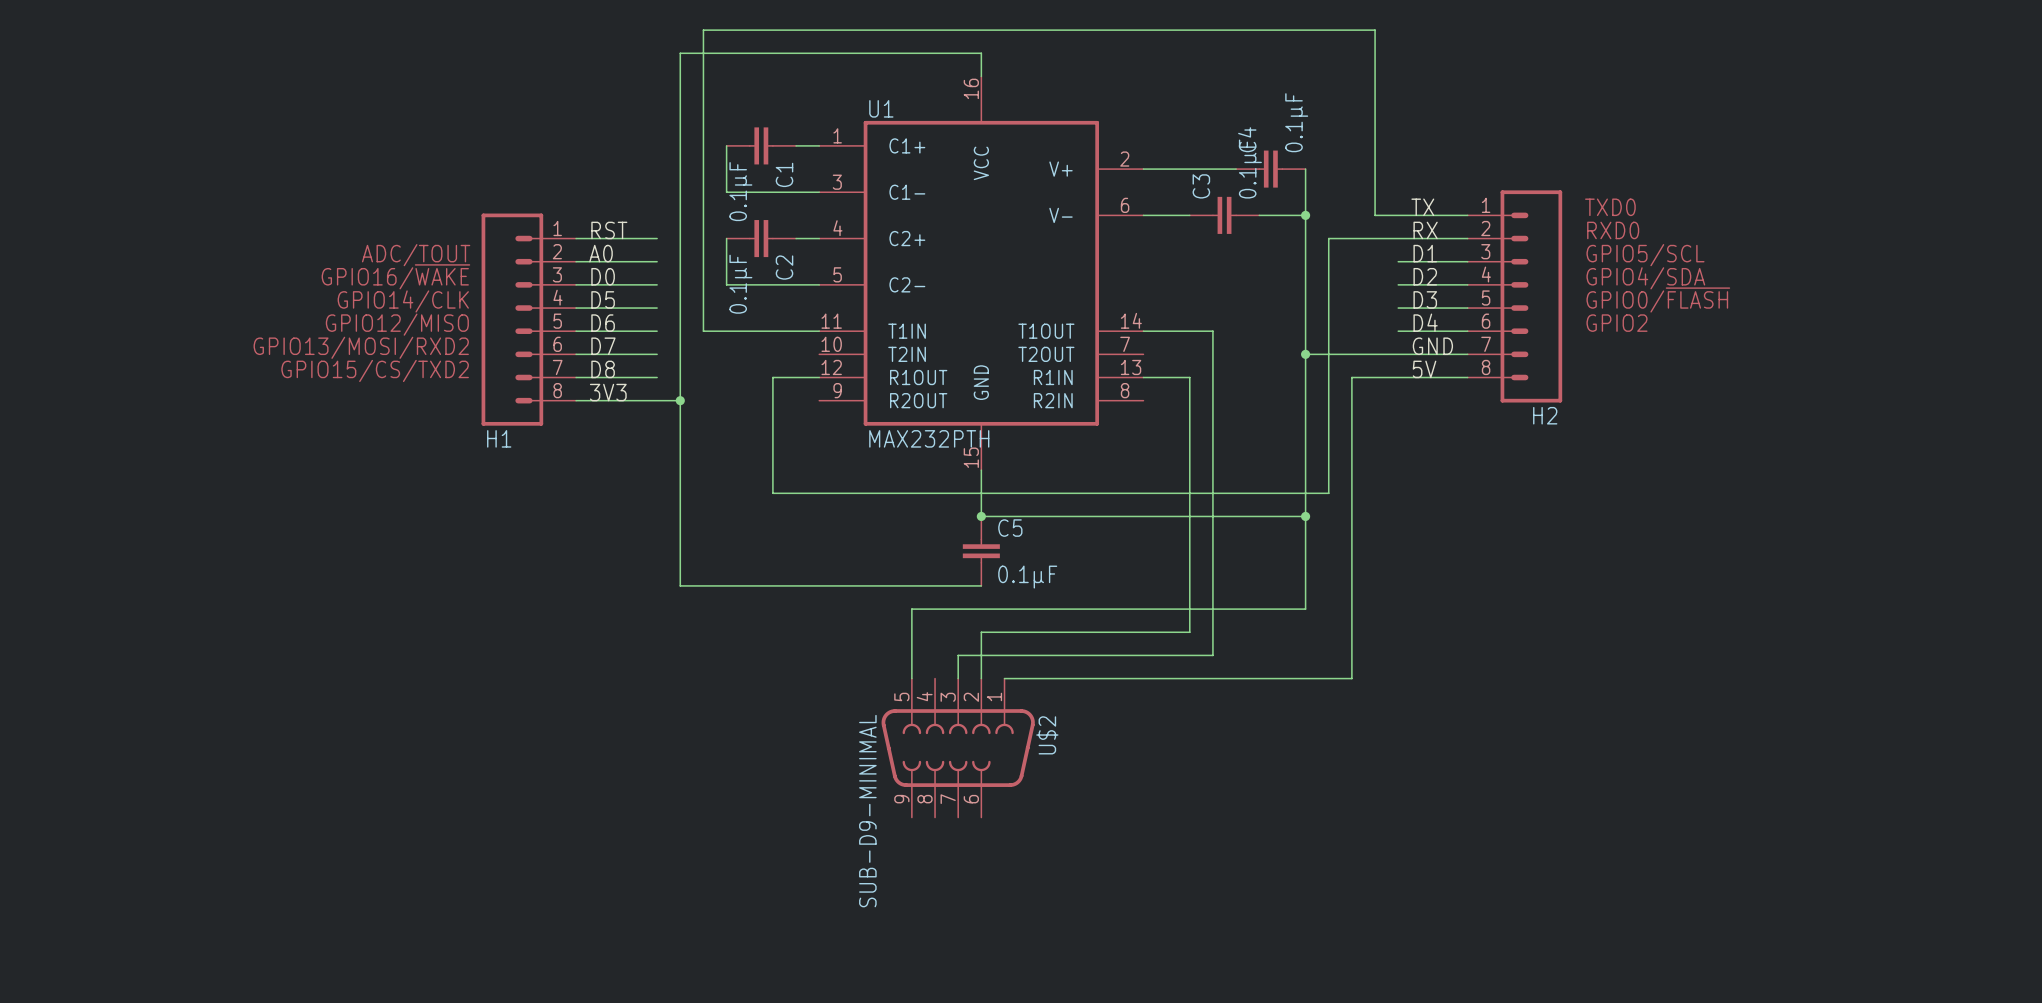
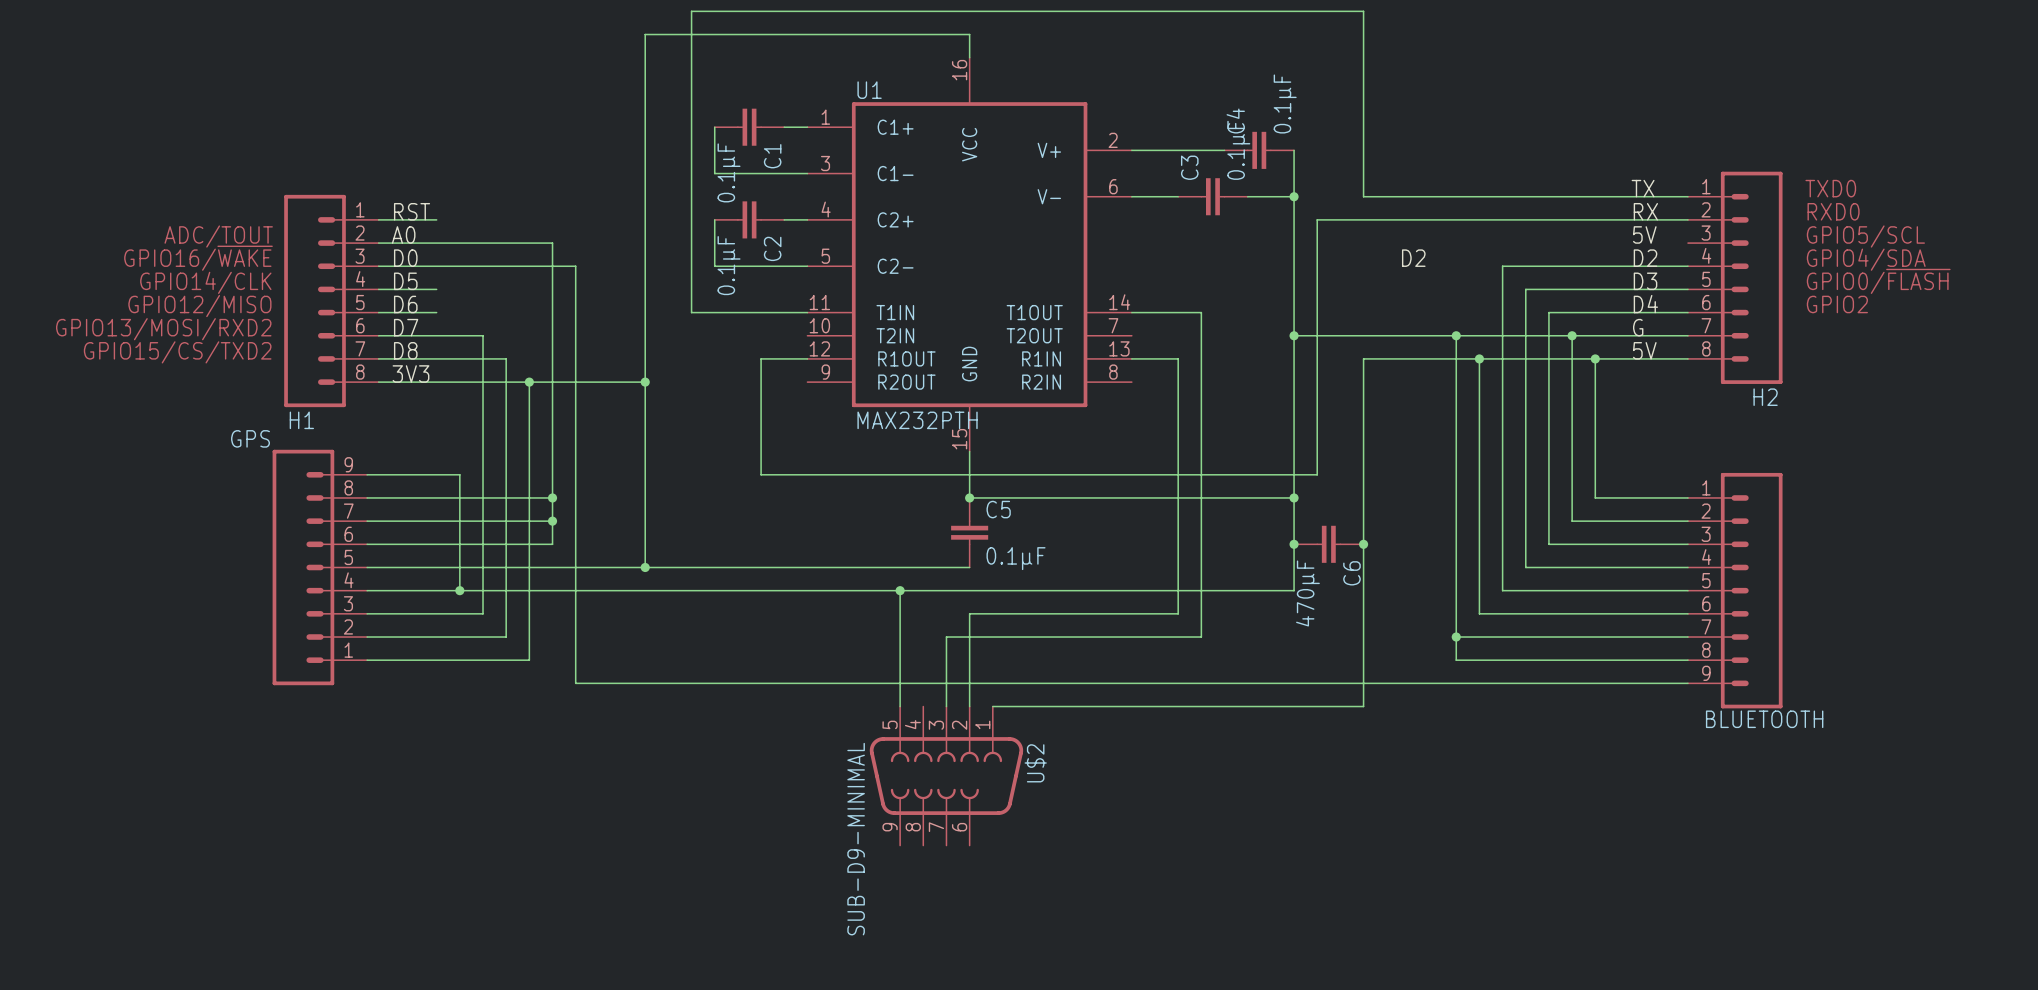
wire: (680, 53) (680, 585) -> (668, 34) (645, 34) (645, 567)
label: TX (1422, 207) -> none
text: TXD0 (1610, 207) -> none
label: none -> TX (1643, 188)
text: none -> TXD0 (1830, 188)
wire: none -> (1456, 196) (1687, 196)
label position: RST (609, 230) -> RST (412, 211)
label: RX (1425, 230) -> none
text: RXD0 (1613, 230) -> none
label: none -> RX (1645, 211)
text: none -> RXD0 (1833, 211)
wire: none -> (378, 219) (436, 219)
wire: (576, 238) (657, 238) -> none
wire: none -> (1456, 219) (1687, 219)
label position: A0 (601, 253) -> A0 (403, 234)
label: D1 (1425, 253) -> none
label: none -> 5V (1644, 234)
text position: ADC/TOUT (416, 255) -> ADC/TOUT (218, 236)
text: GPIO5/SCL (1645, 255) -> none
text: none -> GPIO5/SCL (1865, 236)
wire: none -> (378, 243) (552, 243) (552, 544) (367, 544)
wire: (576, 261) (657, 261) -> none
wire: (1398, 261) (1467, 261) -> none
text position: GPIO16/~{WAKE} (395, 276) -> GPIO16/~{WAKE} (198, 258)
label position: D0 (603, 276) -> D0 (405, 258)
label: none -> D2 (1645, 258)
text: GPIO4/SDA (1645, 278) -> none
text: none -> GPIO4/SDA (1866, 259)
wire: none -> (378, 266) (564, 266)
wire: (587, 284) (657, 284) -> (575, 266) (575, 683) (1687, 683)
wire: (1398, 284) (1467, 284) -> none
wire: none -> (1687, 266) (1502, 266) (1502, 590) (1687, 590)
H2 position: (1514, 296) -> (1735, 277)
label position: D5 (603, 299) -> D5 (405, 281)
label: D3 (1425, 299) -> none
label: none -> D3 (1645, 281)
text: GPIO0/~{FLASH} (1658, 299) -> none
text: none -> GPIO0/~{FLASH} (1878, 281)
text position: GPIO14/CLK (403, 301) -> GPIO14/CLK (205, 282)
wire: none -> (378, 289) (436, 289)
wire: (576, 308) (657, 308) -> none
wire: (1398, 308) (1467, 308) -> none
wire: none -> (1687, 289) (1525, 289) (1525, 567) (1687, 567)
H1 position: (528, 319) -> (331, 301)
label: D4 (1425, 322) -> none
label: none -> D4 (1645, 304)
label position: D6 (603, 323) -> D6 (405, 304)
text: GPIO2 (1617, 323) -> none
text: none -> GPIO2 (1837, 304)
text position: GPIO12/MISO (397, 324) -> GPIO12/MISO (199, 306)
wire: none -> (378, 312) (436, 312)
wire: (576, 331) (657, 331) -> none
wire: (1398, 331) (1467, 331) -> none
wire: none -> (1687, 312) (1548, 312) (1548, 544) (1687, 544)
label position: D7 (603, 346) -> D7 (406, 327)
label: GND (1432, 346) -> none
label: none -> G (1638, 327)
text position: GPIO13/MOSI/RXD2 (361, 347) -> GPIO13/MOSI/RXD2 (163, 329)
wire: none -> (378, 335) (483, 335) (483, 613) (367, 613)
wire: (576, 354) (657, 354) -> none
junction: none -> (1456, 335)
wire: none -> (1572, 335) (1572, 521) (1687, 521)
junction: none -> (1572, 335)
wire: none -> (1687, 335) (1456, 335) (1456, 660) (1687, 660)
label position: D8 (603, 369) -> D8 (405, 350)
label: 5V (1424, 369) -> none
label: none -> 5V (1644, 350)
text position: GPIO15/CS/TXD2 (375, 370) -> GPIO15/CS/TXD2 (177, 352)
wire: none -> (378, 358) (506, 358) (506, 637) (367, 637)
wire: (576, 377) (657, 377) -> none
wire: (1375, 377) (1351, 377) (1351, 678) (1004, 678) -> (1363, 358) (1363, 706) (992, 706)
wire: none -> (1456, 358) (1687, 358)
wire: none -> (1479, 358) (1479, 613) (1687, 613)
junction: none -> (1479, 358)
wire: none -> (1595, 358) (1595, 497) (1687, 497)
junction: none -> (1595, 358)
label position: 3V3 (608, 392) -> 3V3 (410, 374)
wire: none -> (378, 382) (564, 382)
wire: none -> (529, 382) (529, 660) (367, 660)
junction: none -> (529, 382)
wire: (657, 400) (680, 400) -> none
junction position: (680, 400) -> (645, 382)
wire: none -> (367, 474) (459, 474) (459, 590)
wire: none -> (367, 497) (552, 497)
junction: none -> (552, 497)
wire: none -> (367, 521) (552, 521)
junction: none -> (552, 521)
junction: none -> (1294, 544)
C6: none -> 470µF (1328, 544)
junction: none -> (1363, 544)
GPS: none -> (319, 567)
wire: none -> (367, 567) (668, 567)
junction: none -> (645, 567)
wire: none -> (367, 590) (900, 590)
junction: none -> (459, 590)
junction: none -> (900, 590)
BLUETOOTH: none -> (1735, 590)
wire: none -> (1456, 637) (1687, 637)
junction: none -> (1456, 637)
U$2 position: (958, 748) -> (946, 776)

